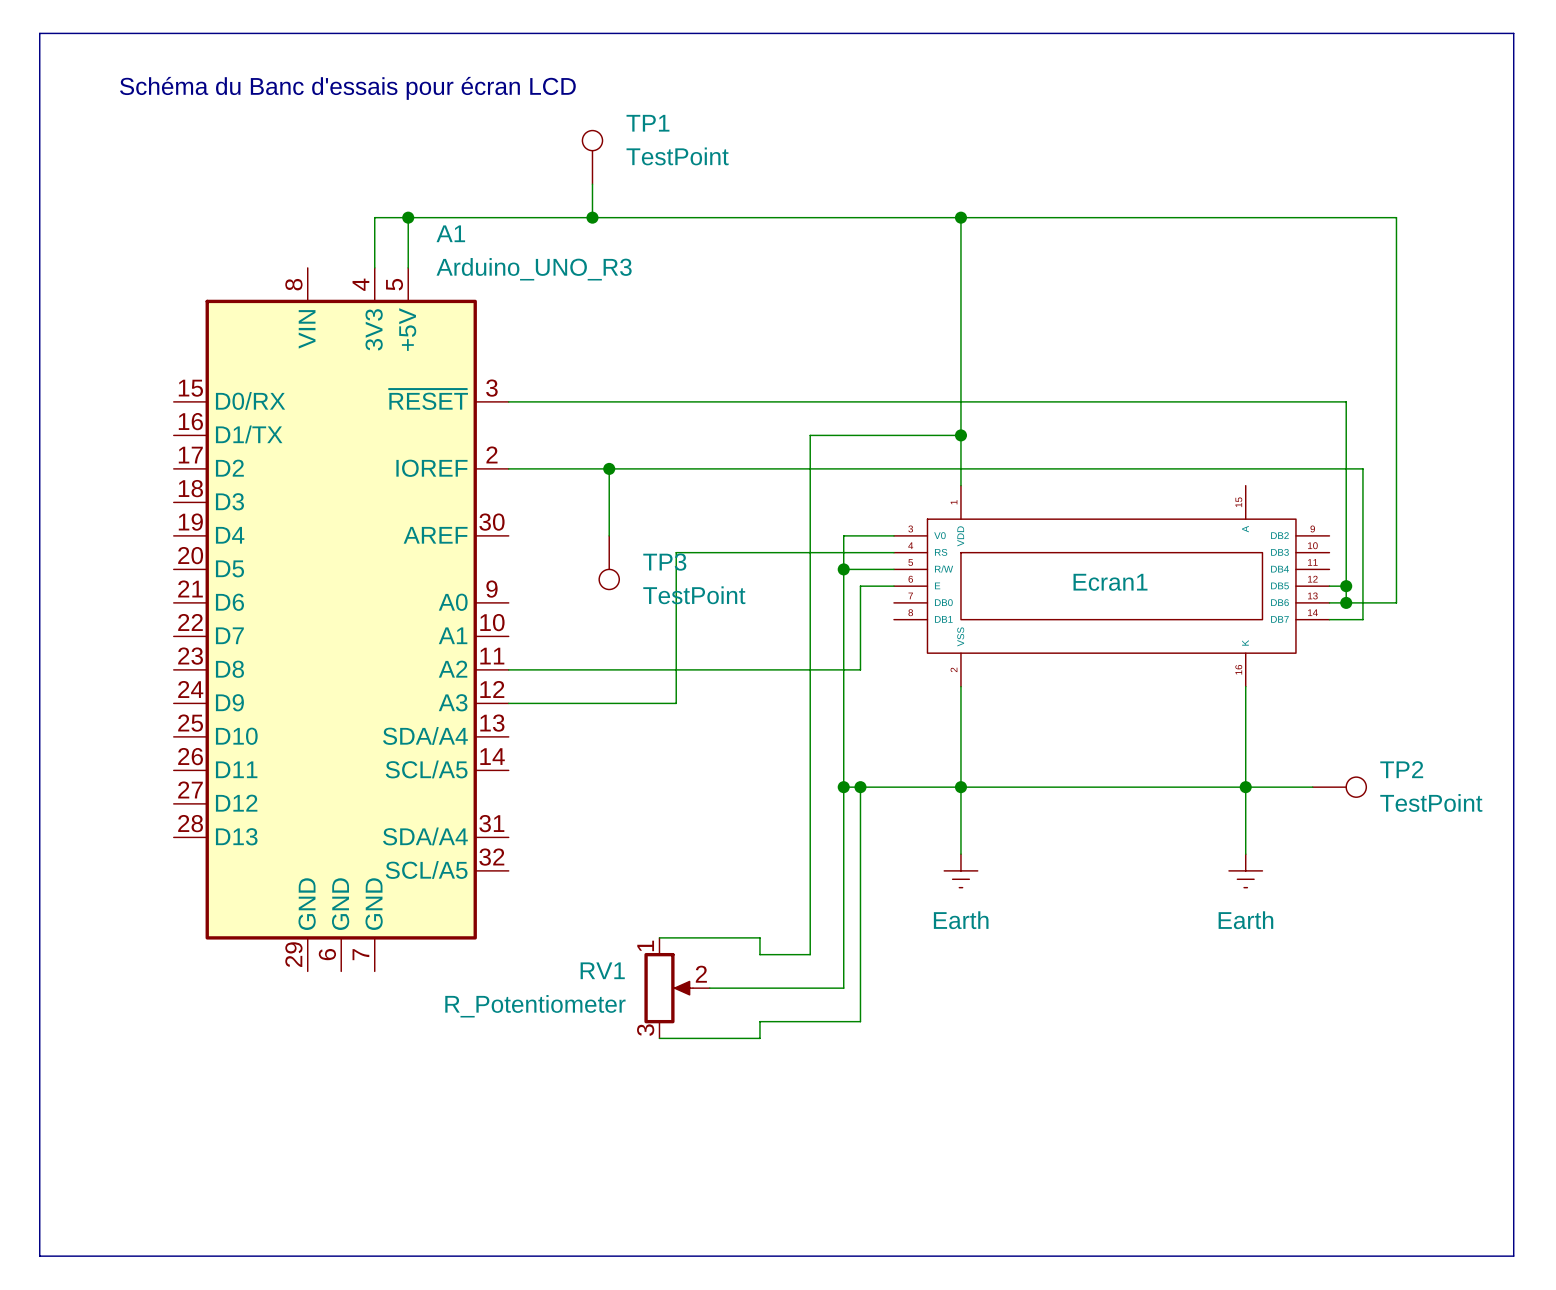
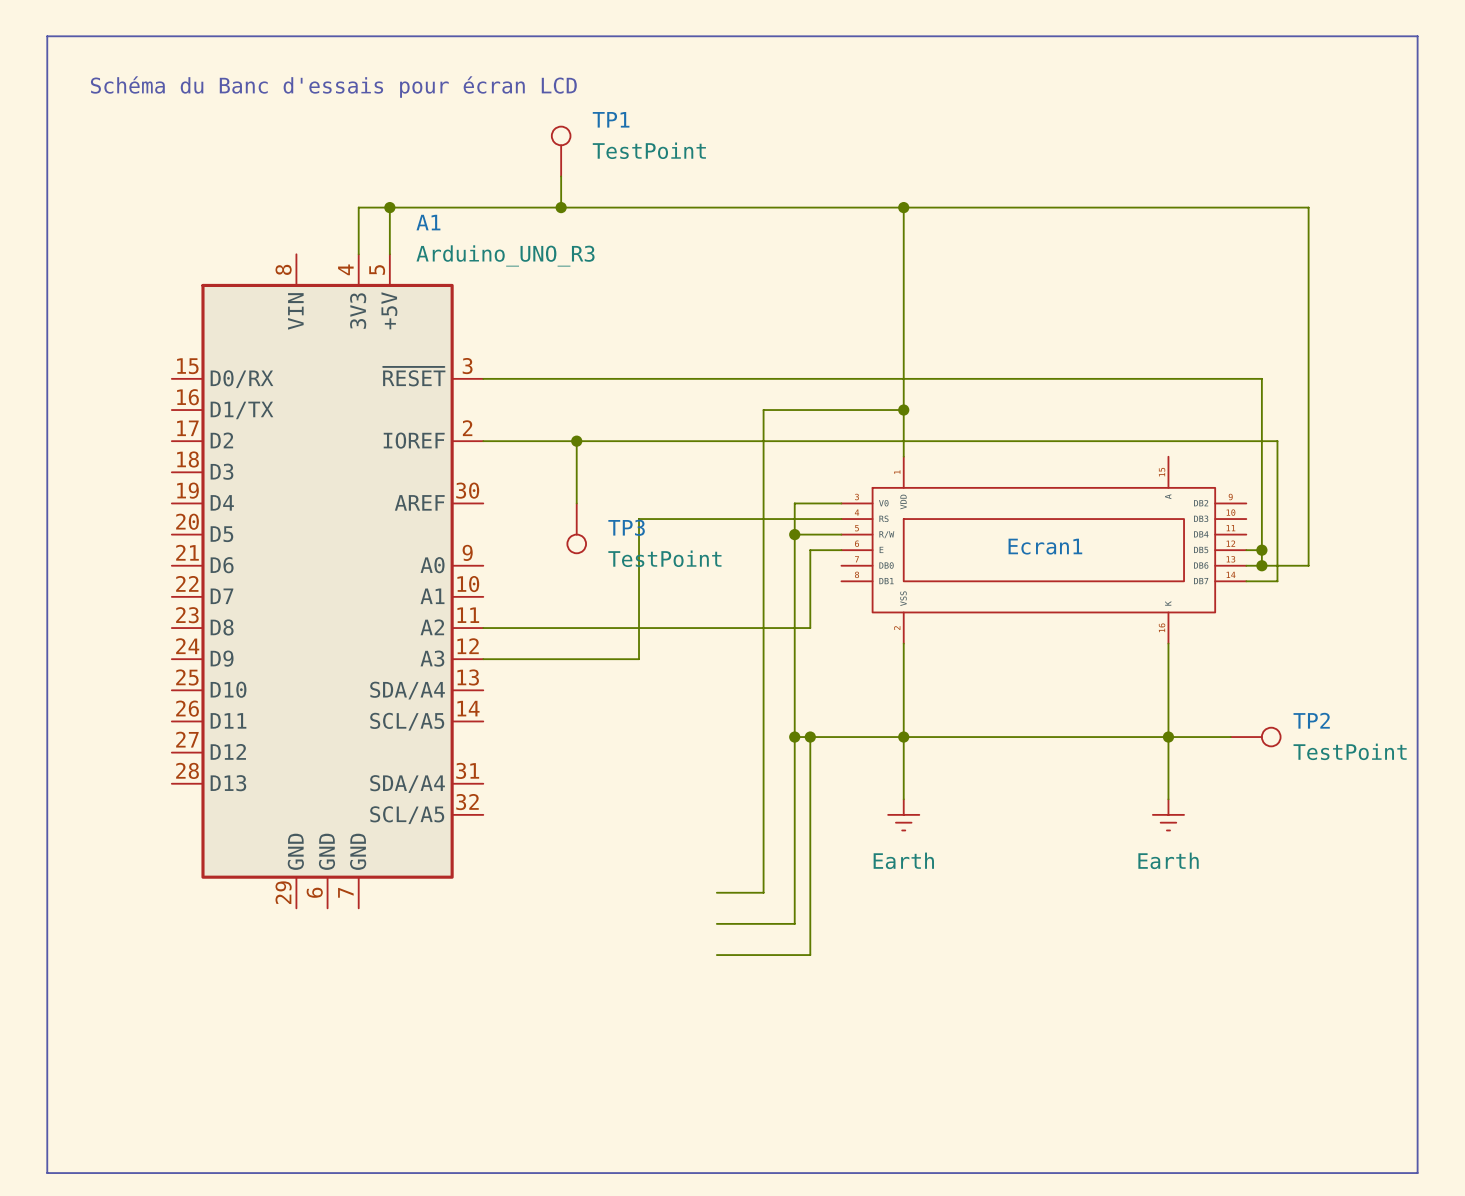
wire: (659, 937) (759, 937) (759, 954) -> none
RV1: R_Potentiometer (677, 988) -> none
wire: (709, 988) (759, 988) -> none
wire: (759, 1021) (759, 1038) (659, 1038) -> none

